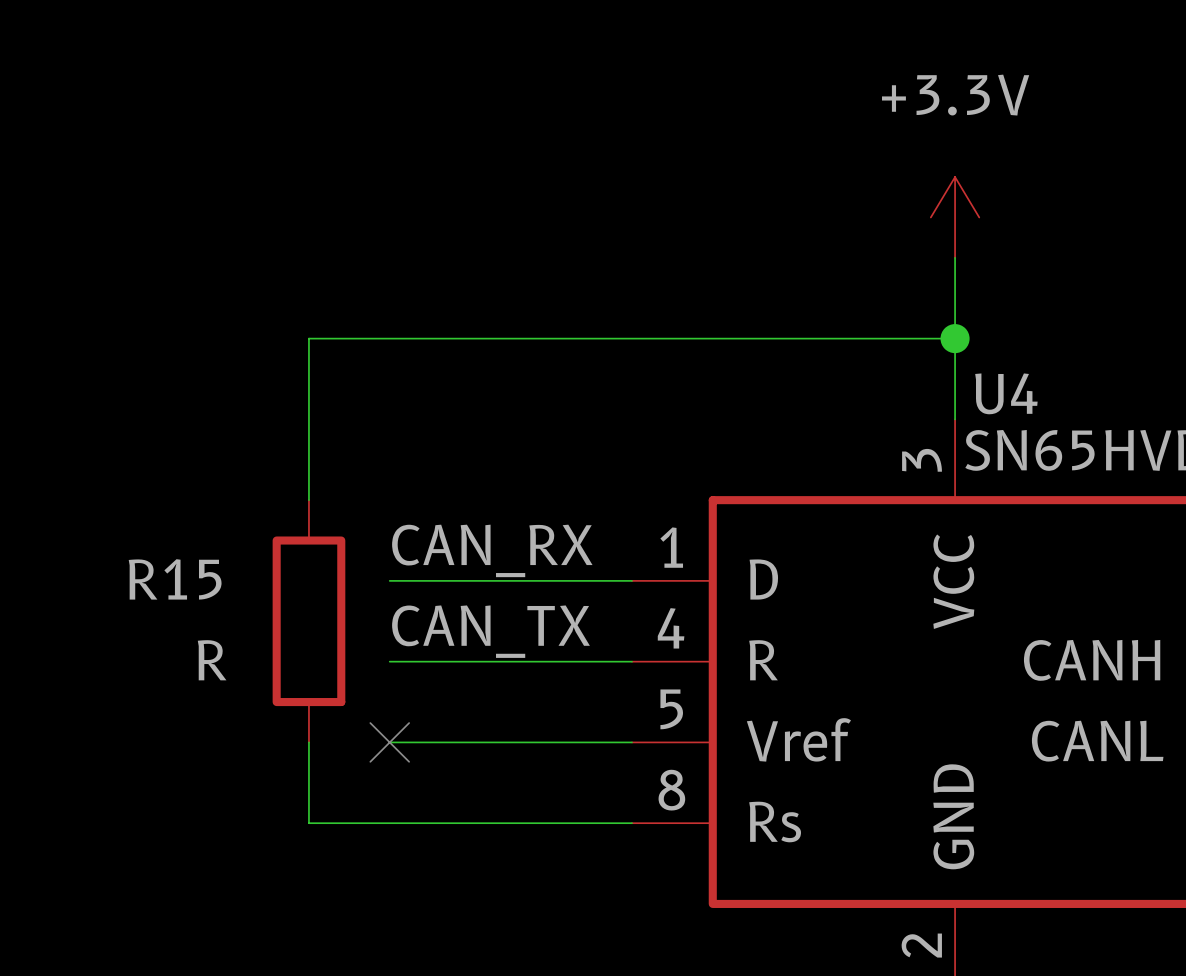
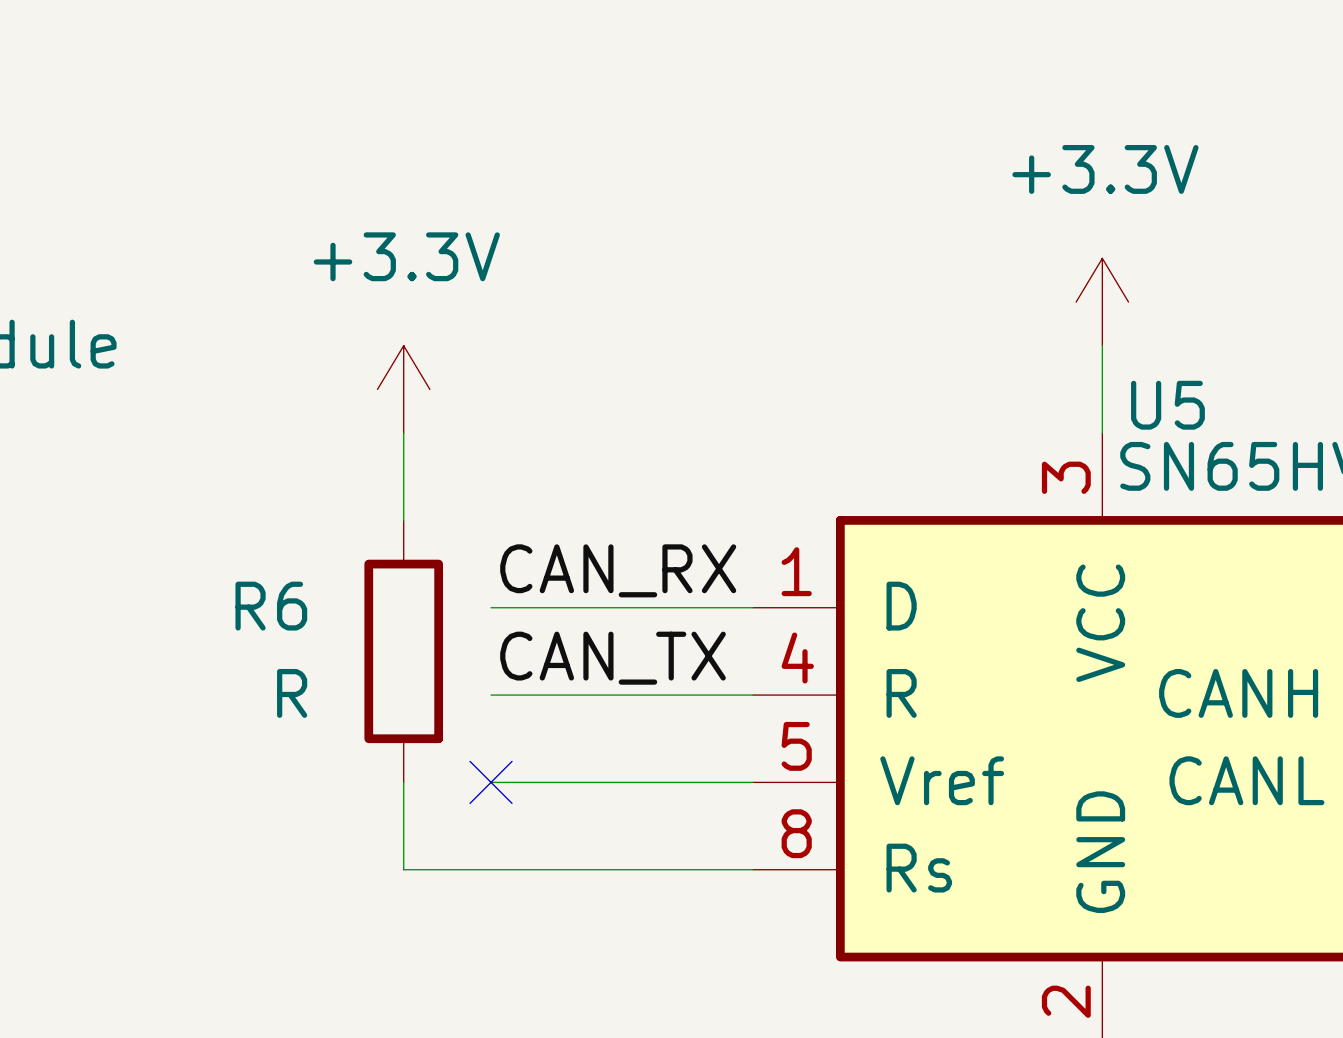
power symbol position: +3.3V (955, 217) -> +3.3V (1102, 302)
wire: (955, 257) (955, 338) (308, 338) (308, 419) -> none
junction: (955, 338) -> none
power symbol: none -> +3.3V (403, 389)
U4 name: U4 (1006, 393) -> U5 (1167, 405)
R15 name: R15 (175, 579) -> R6 (271, 606)

